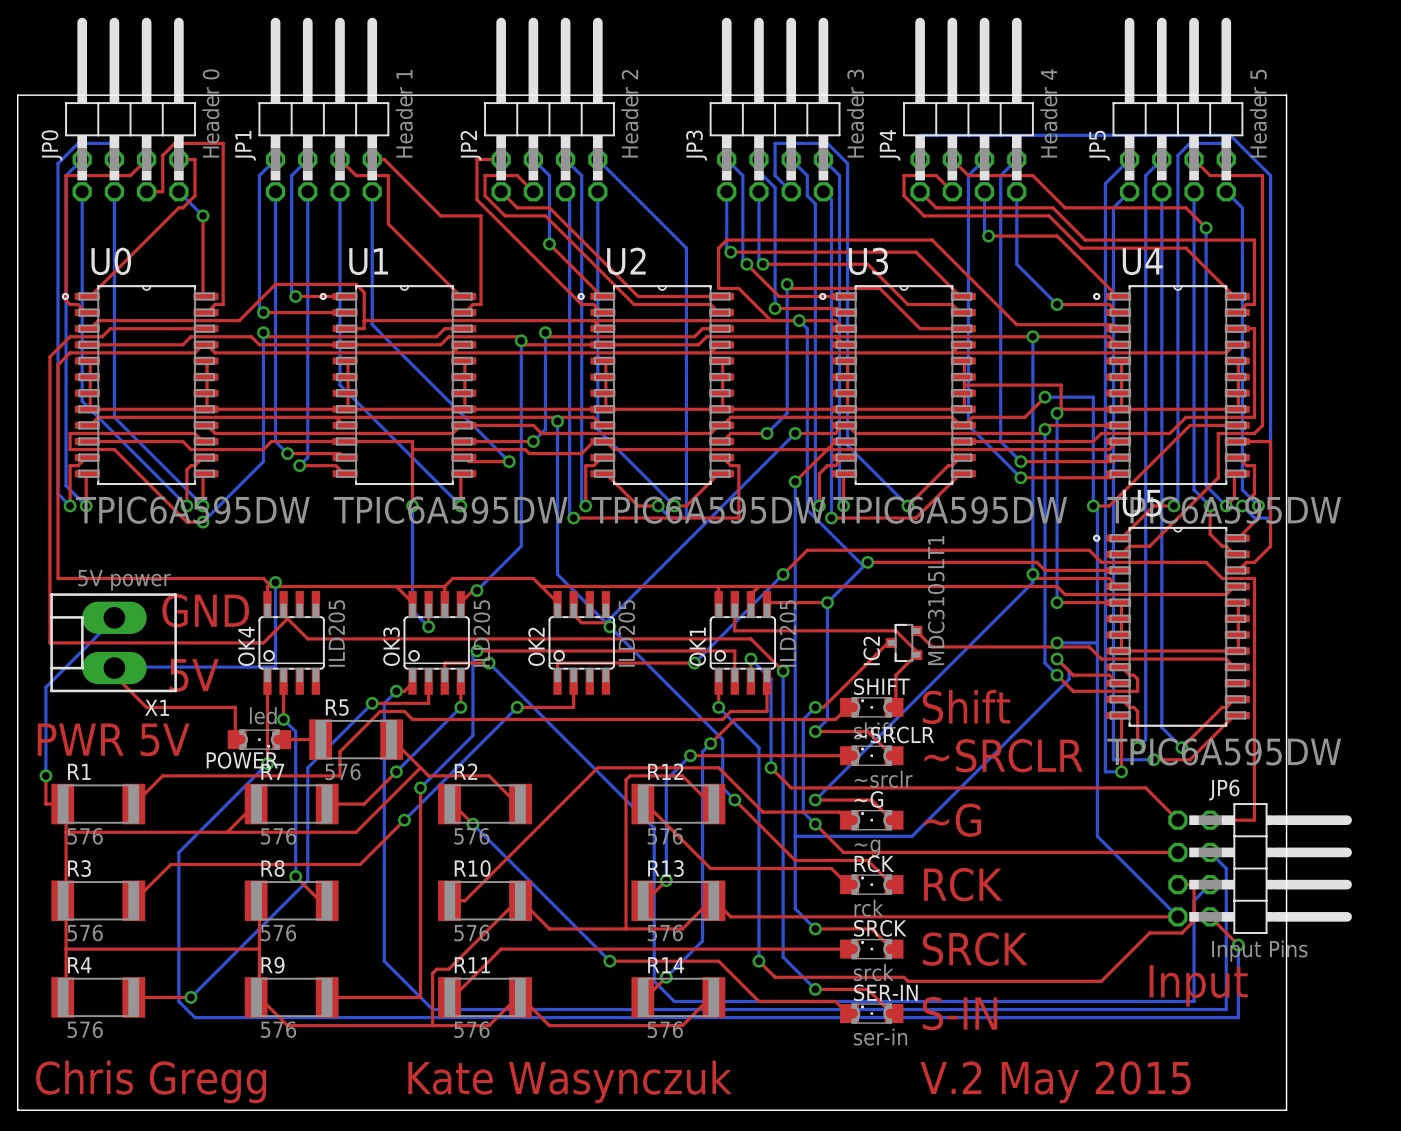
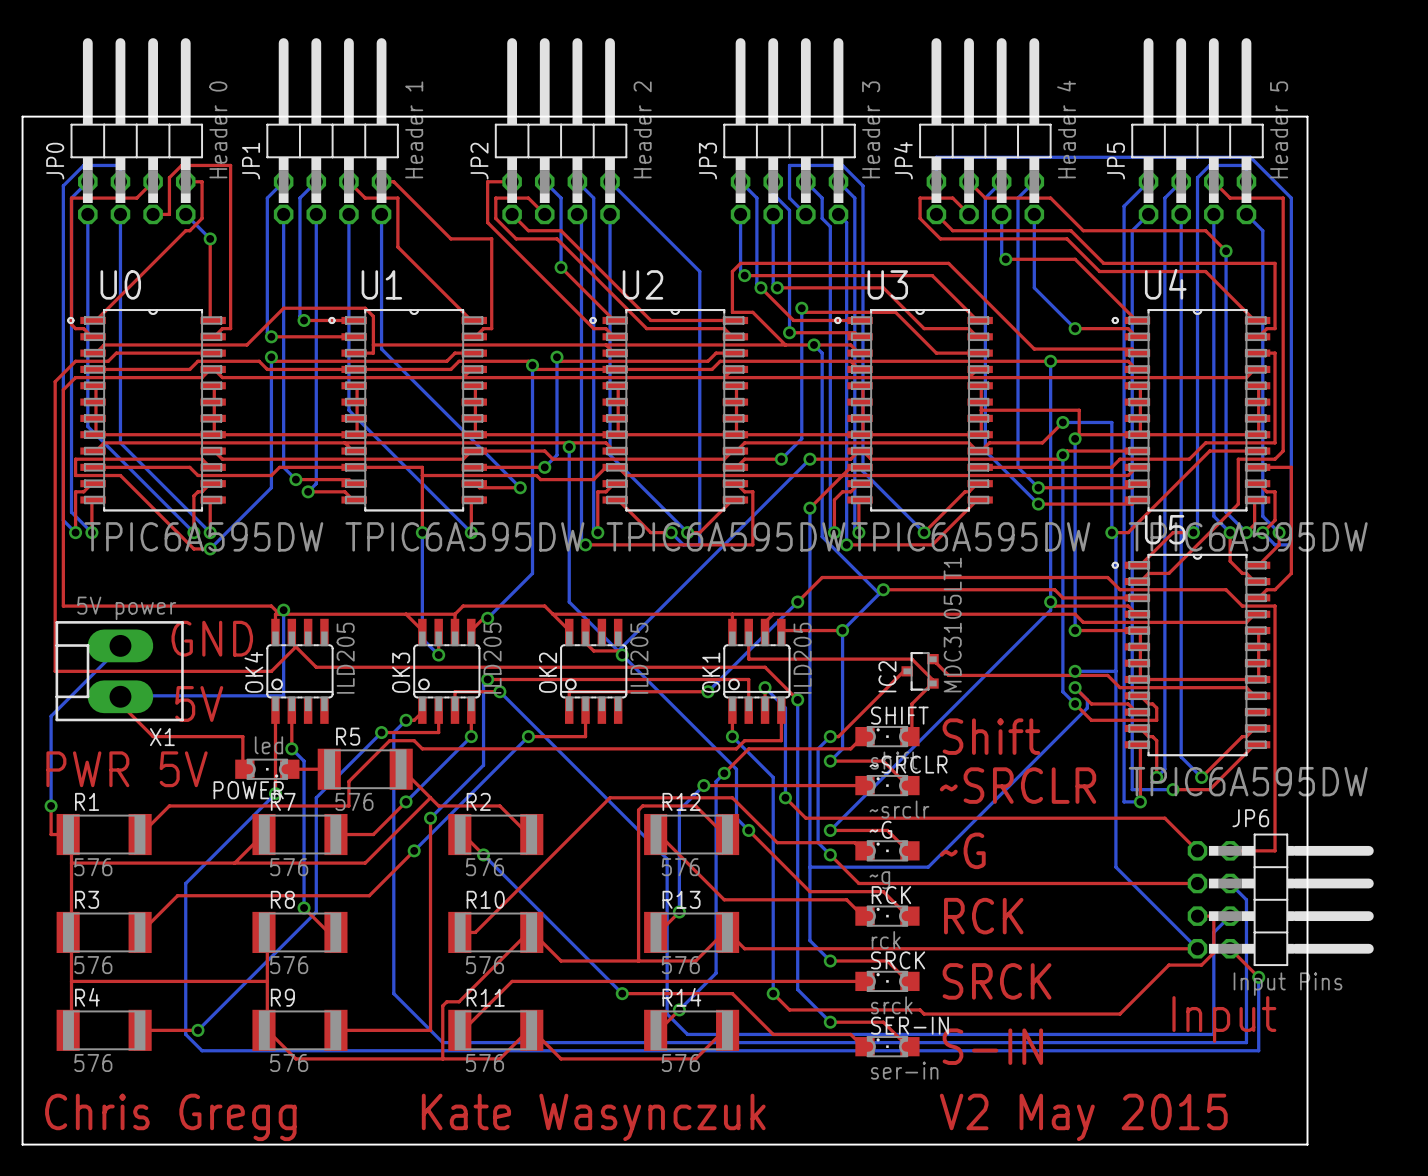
text: V.2 May 2015 (1055, 1082) -> V2 May 2015 (1083, 1117)

